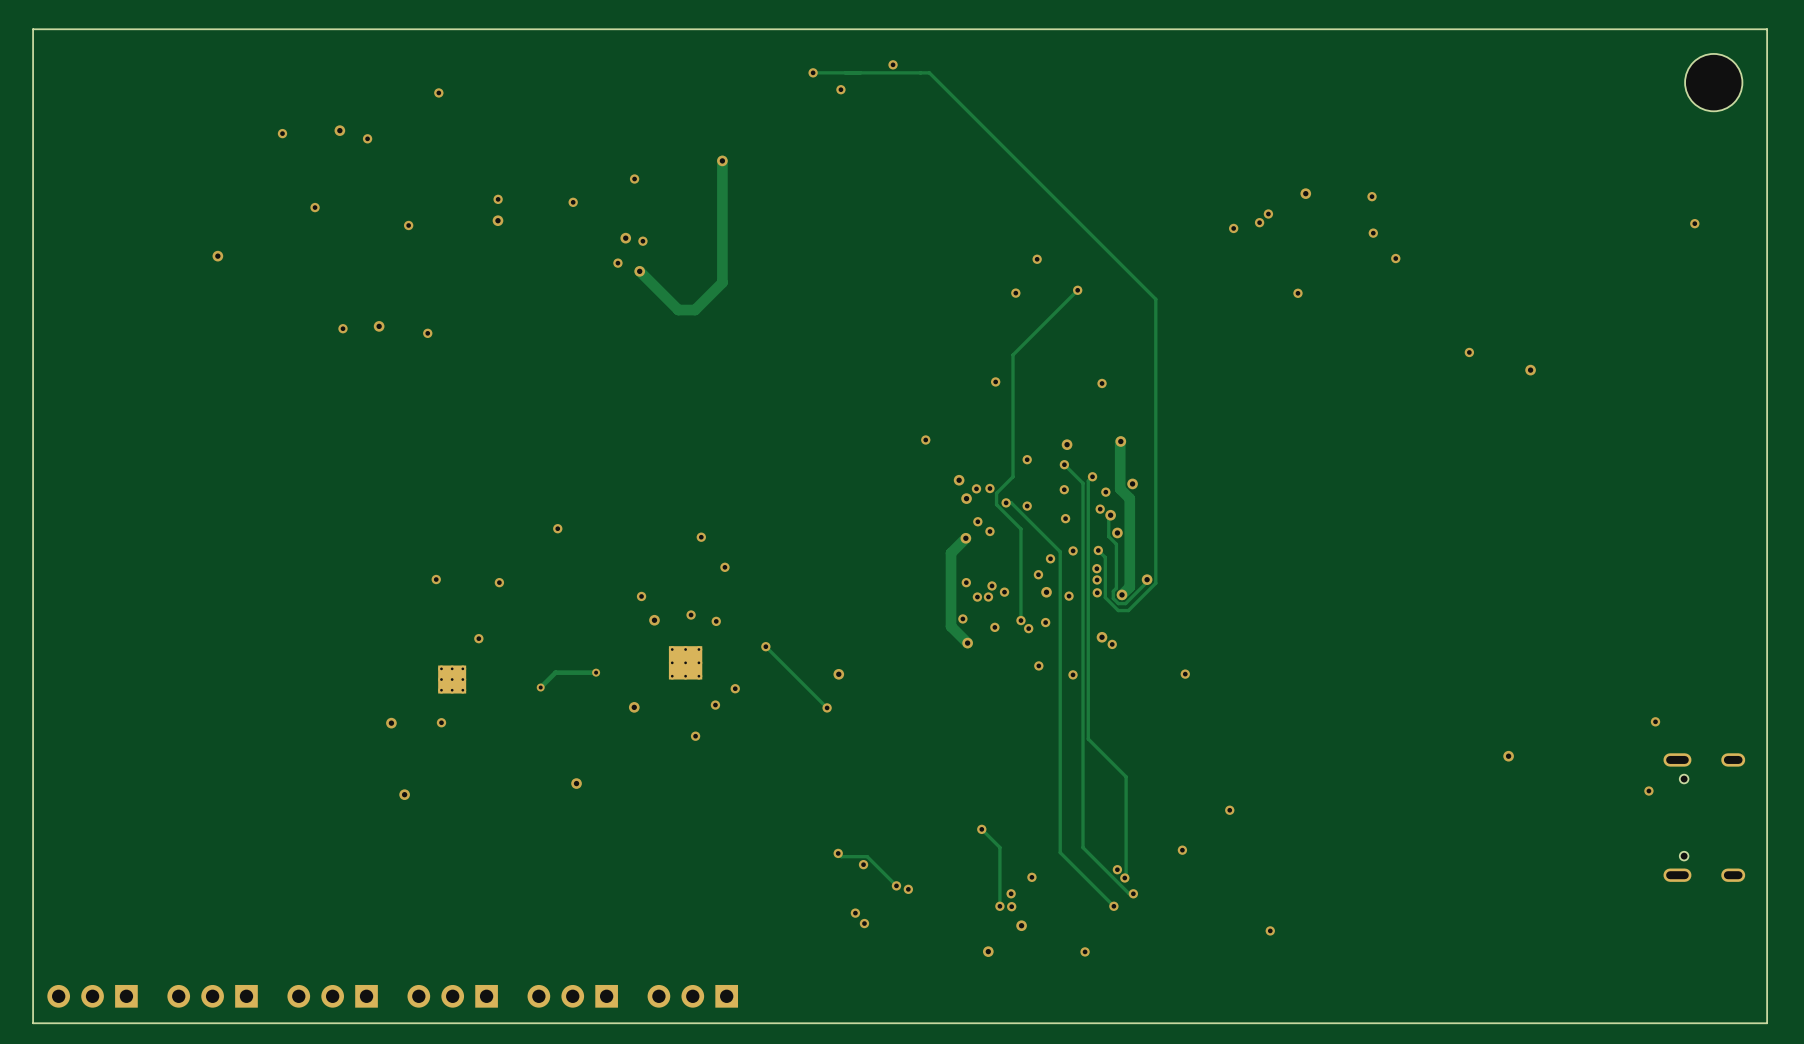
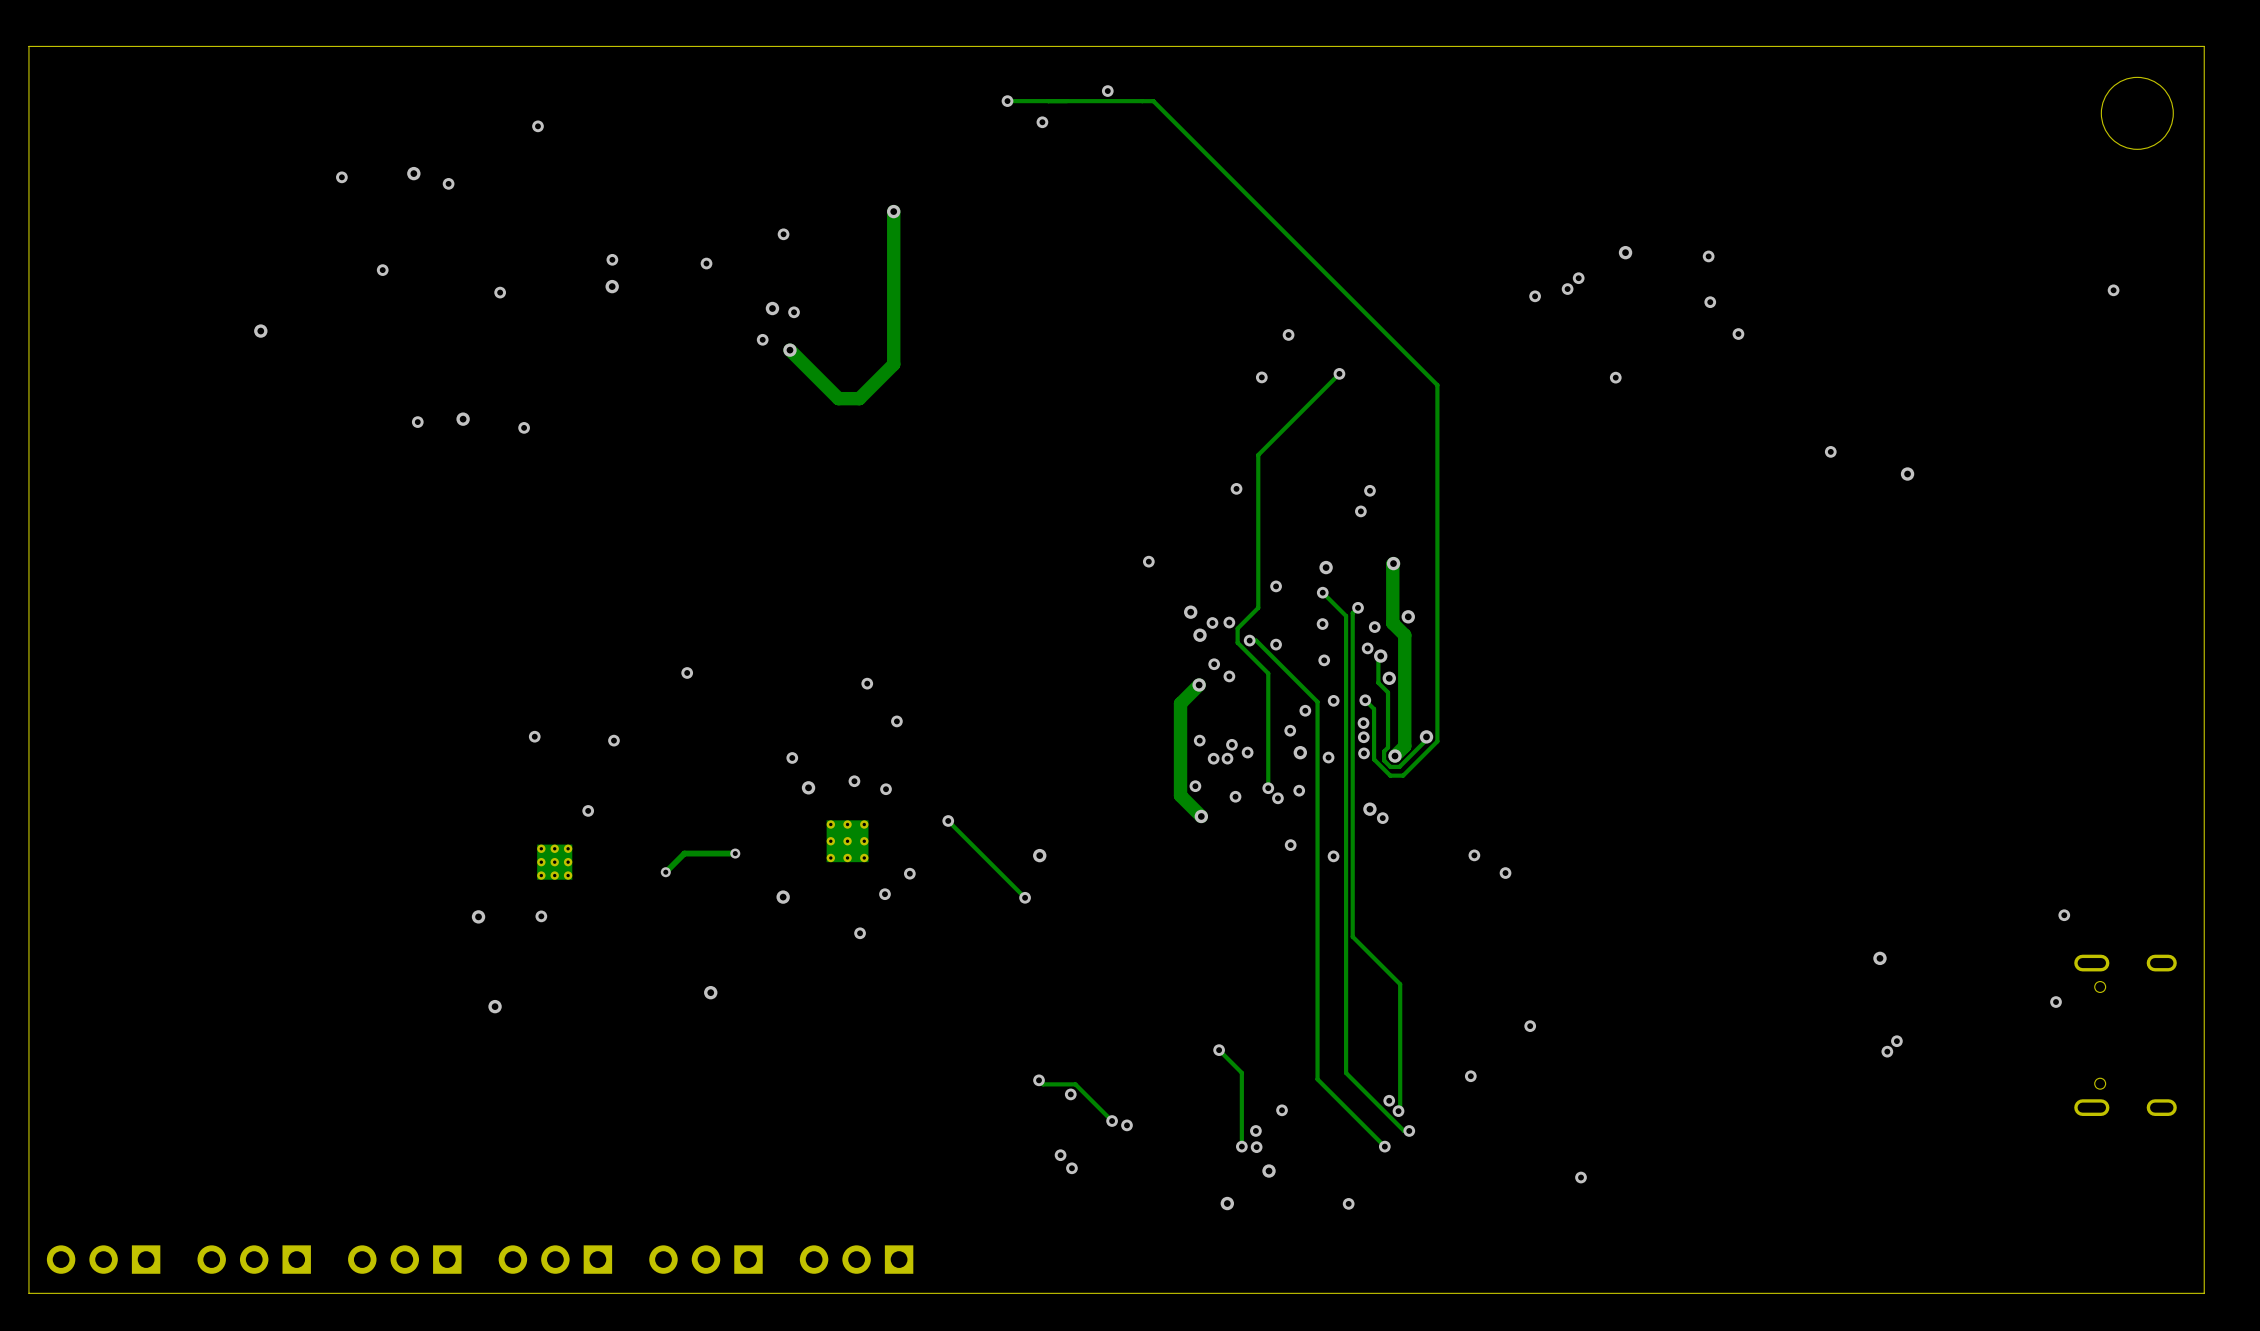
via: none -> (1360, 511)
via: none -> (1505, 873)
via: none -> (1896, 1041)
via: none -> (1887, 1051)

